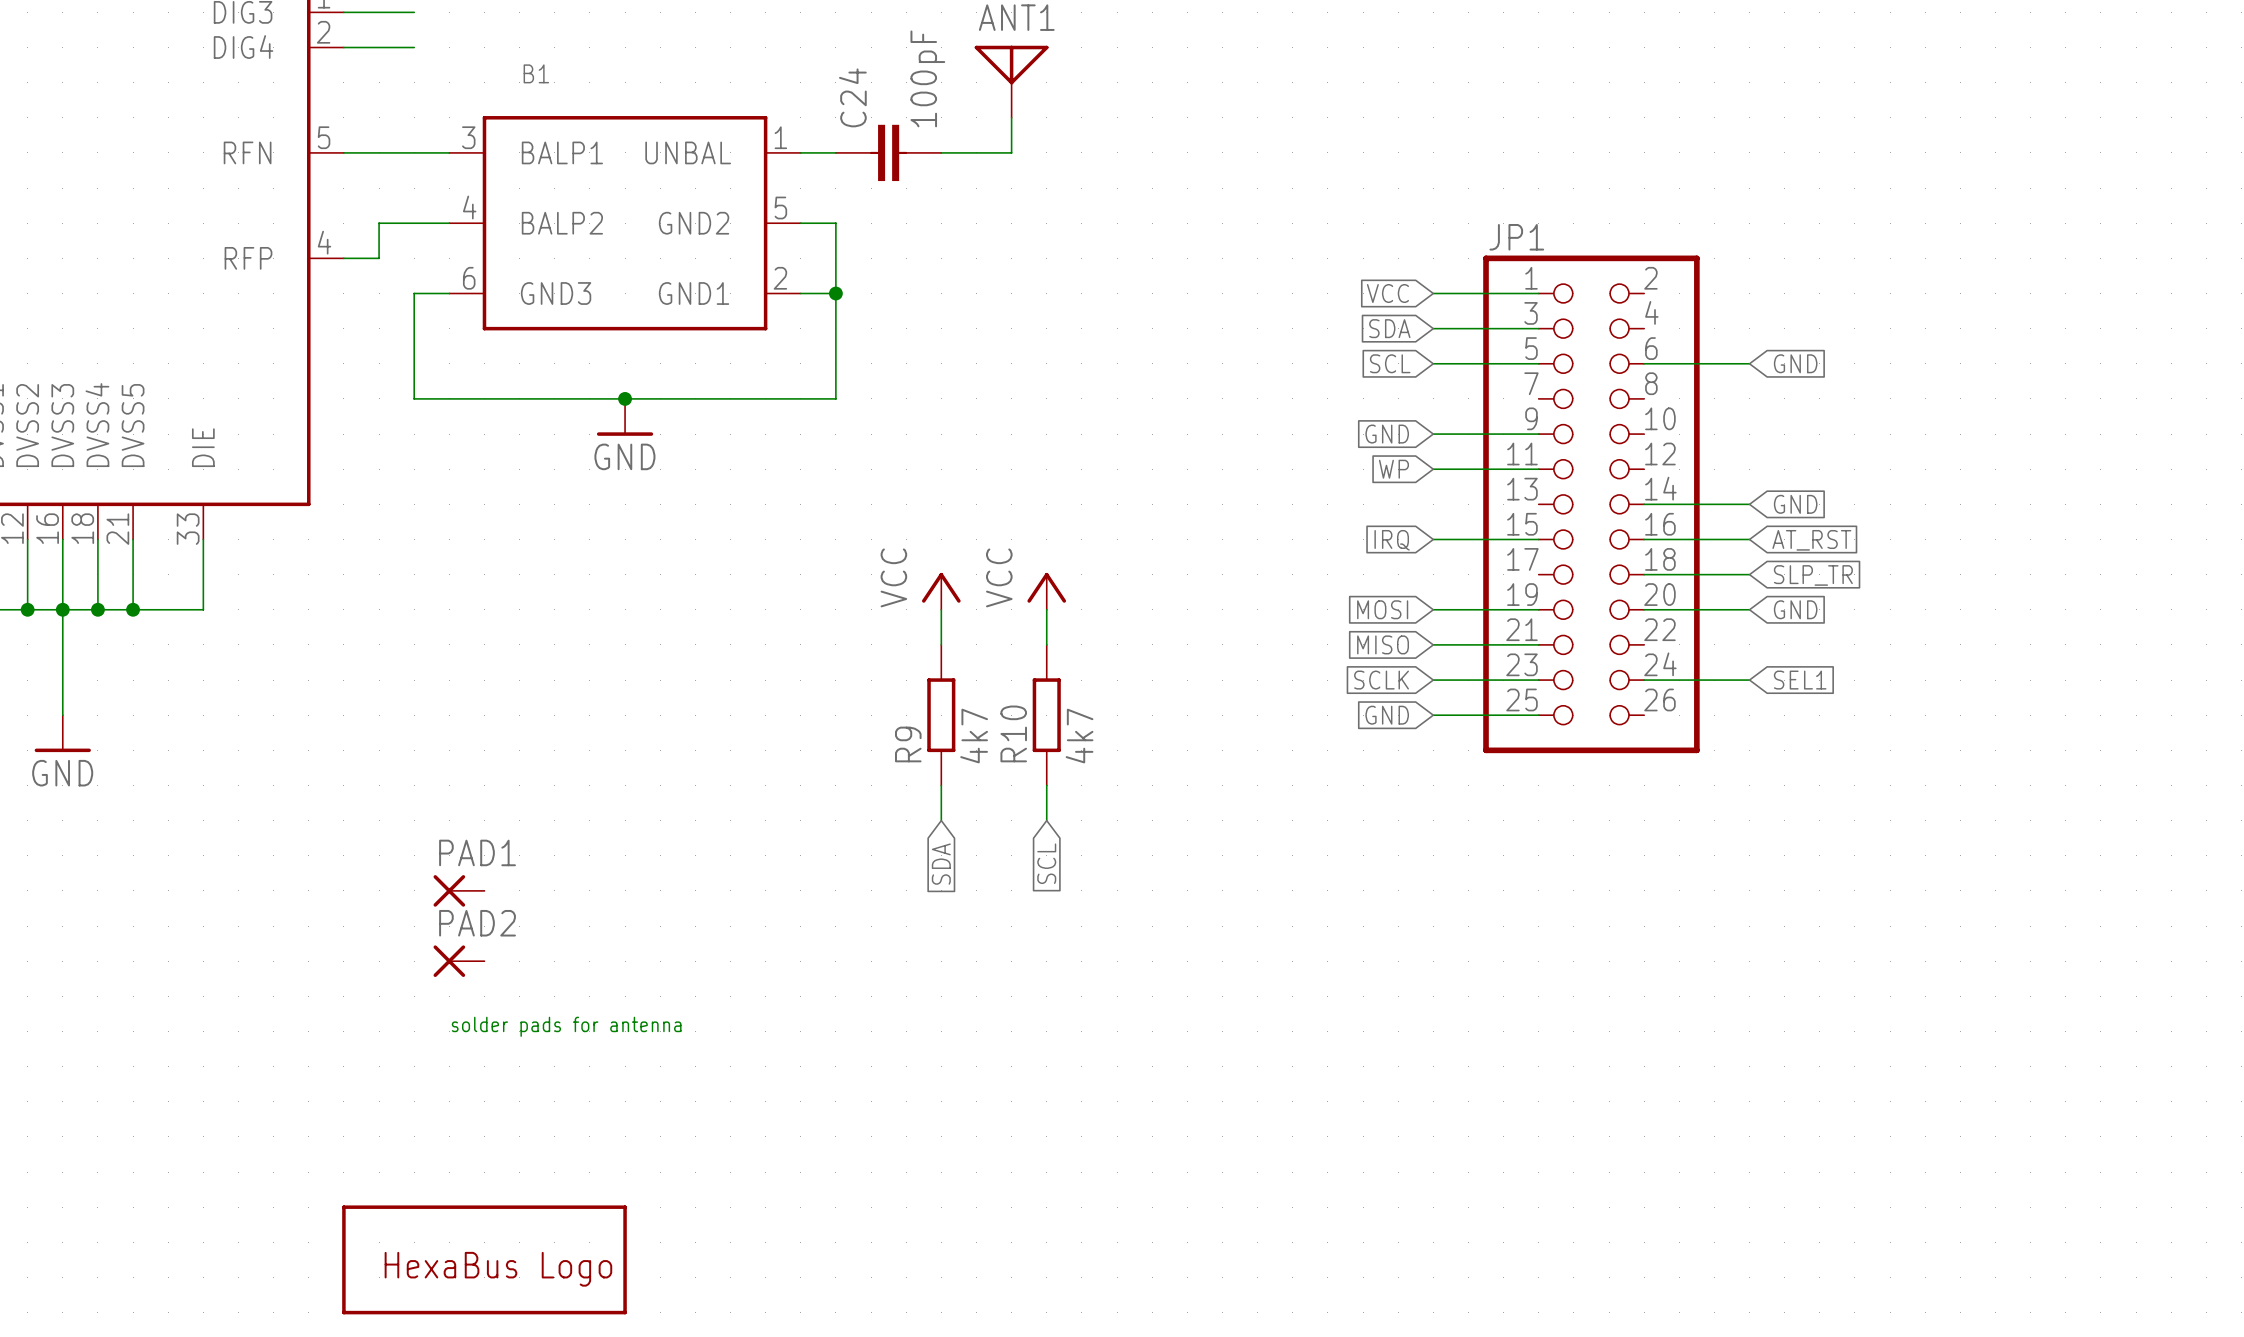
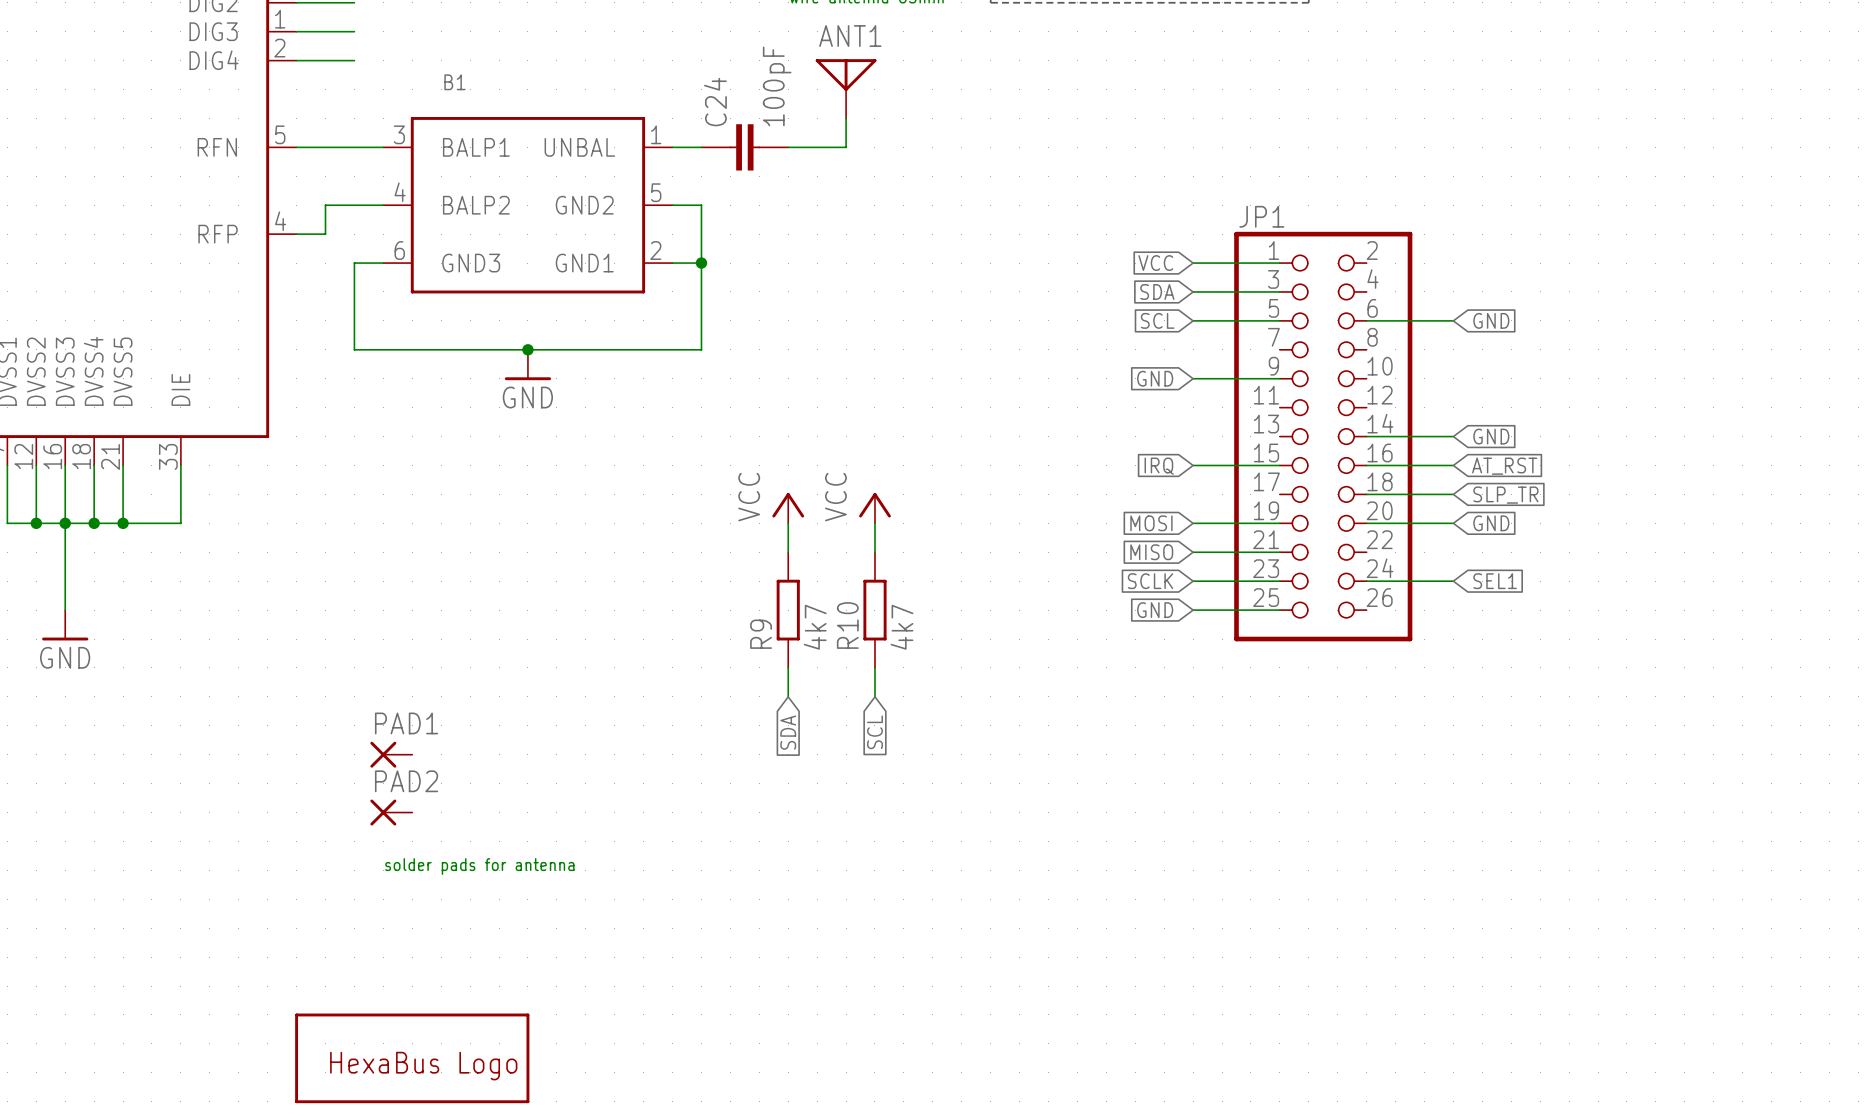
global label: WP (1393, 469) -> none
wire: (1433, 469) (1538, 469) -> none

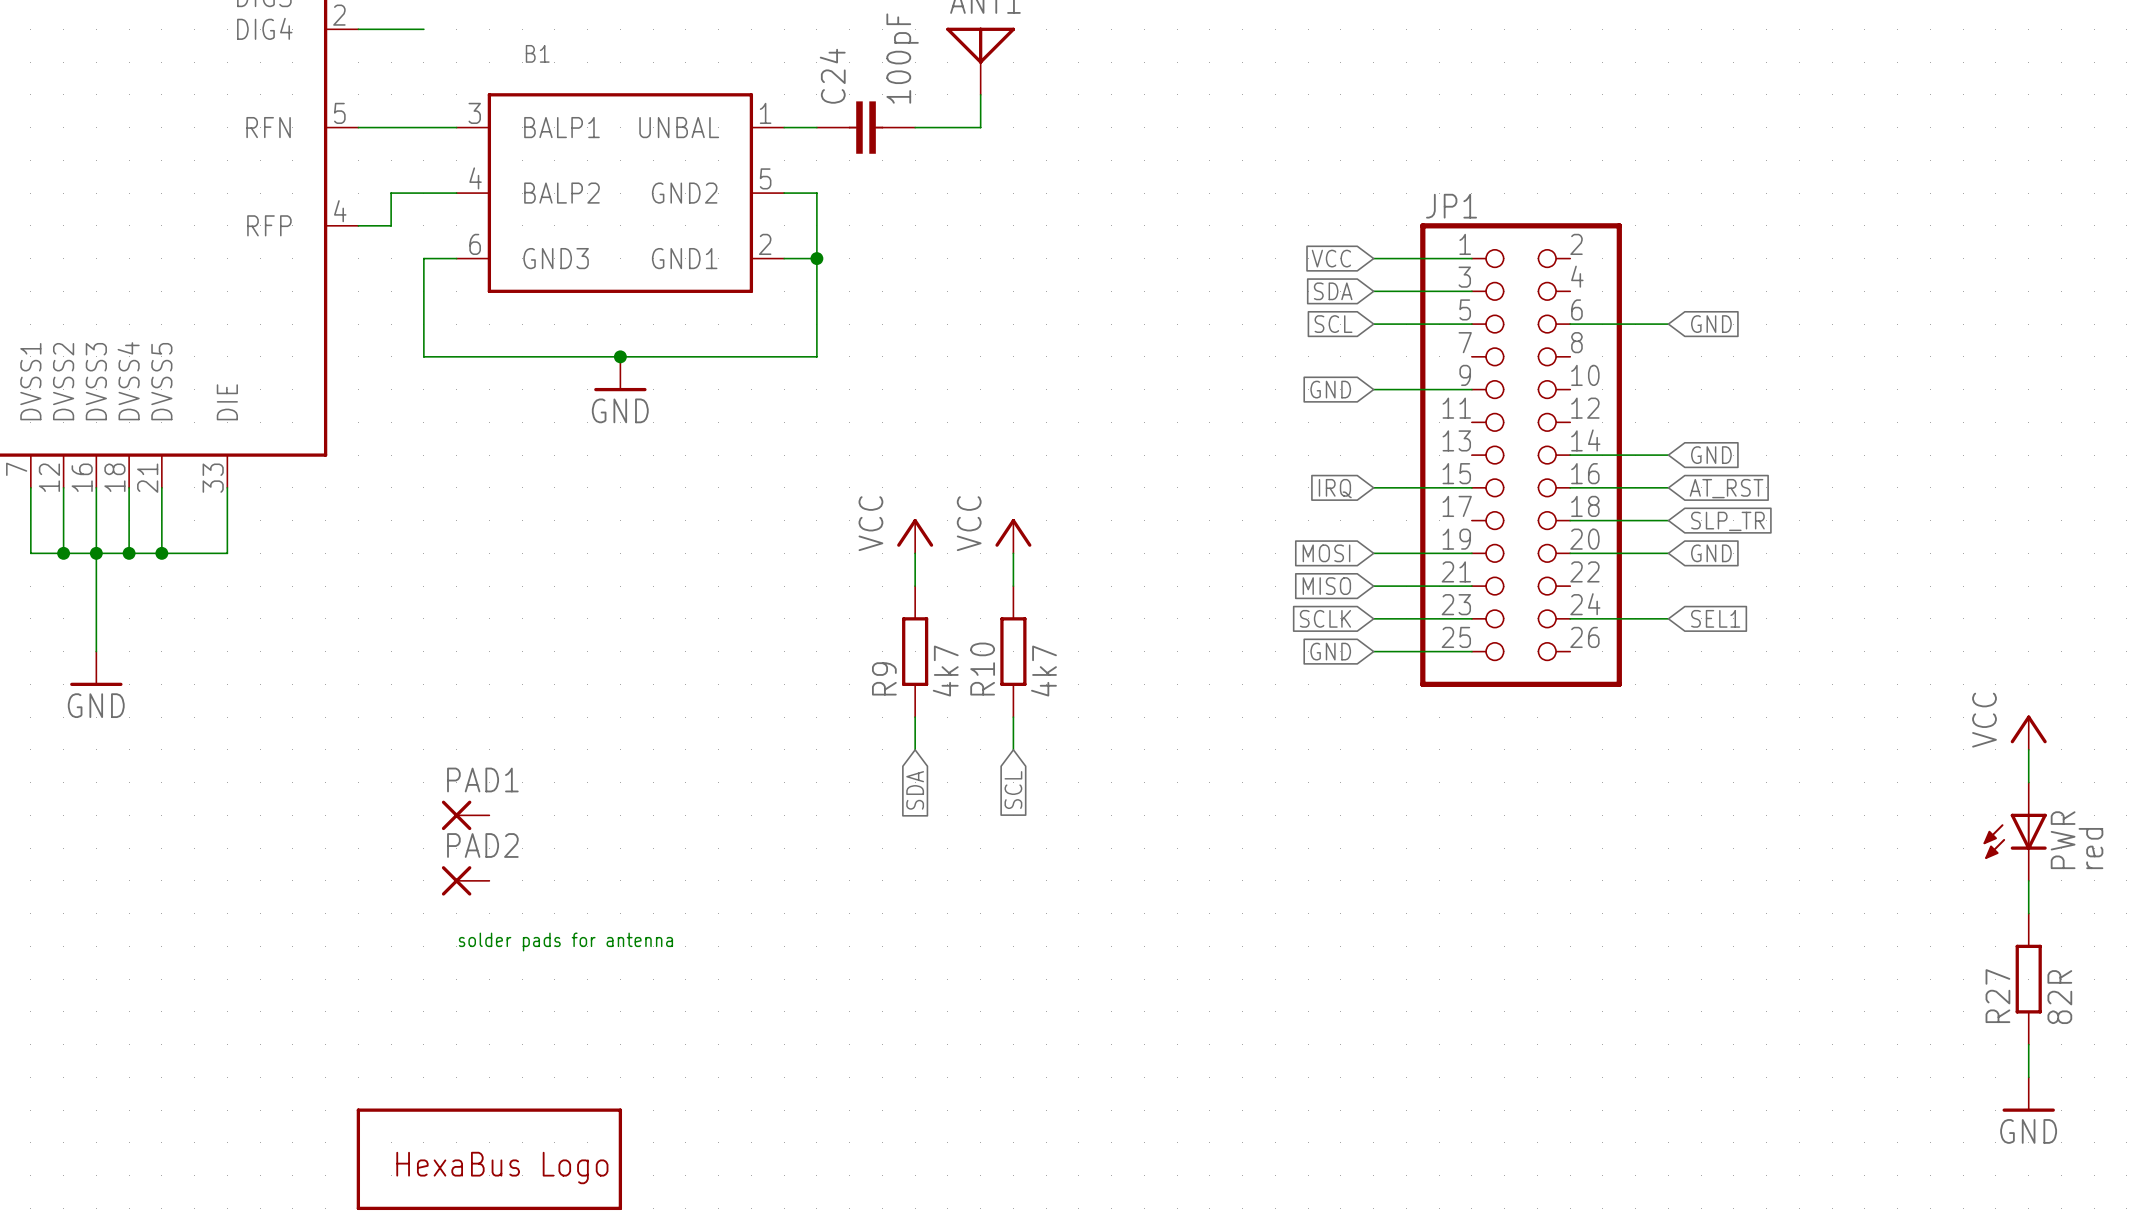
power symbol: none -> VCC (2028, 732)
wire: none -> (2028, 749) (2028, 782)
PWR: none -> red (2015, 831)
wire: none -> (2028, 880) (2028, 913)
R27: none -> 82R (2028, 979)
wire: none -> (2028, 1044) (2028, 1077)
power symbol: none -> GND (2028, 1094)

